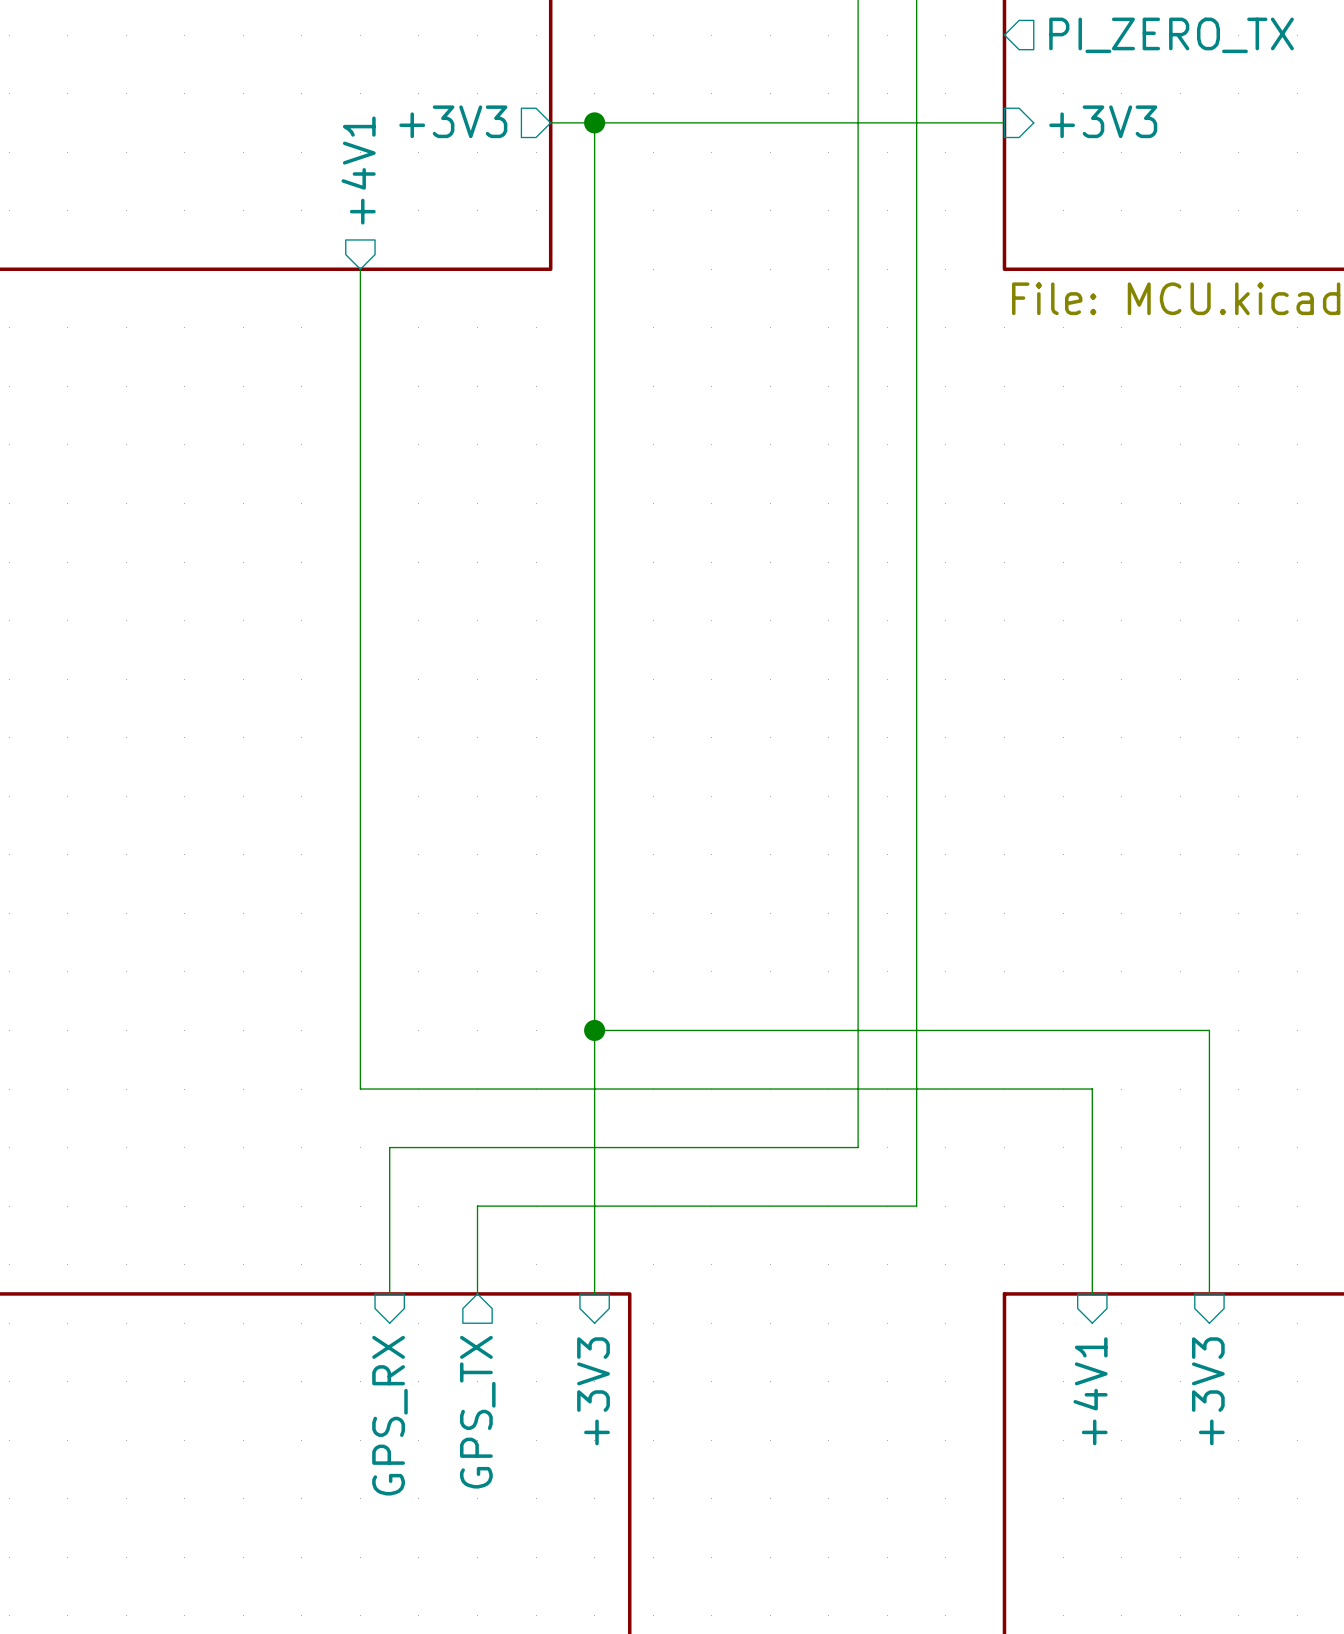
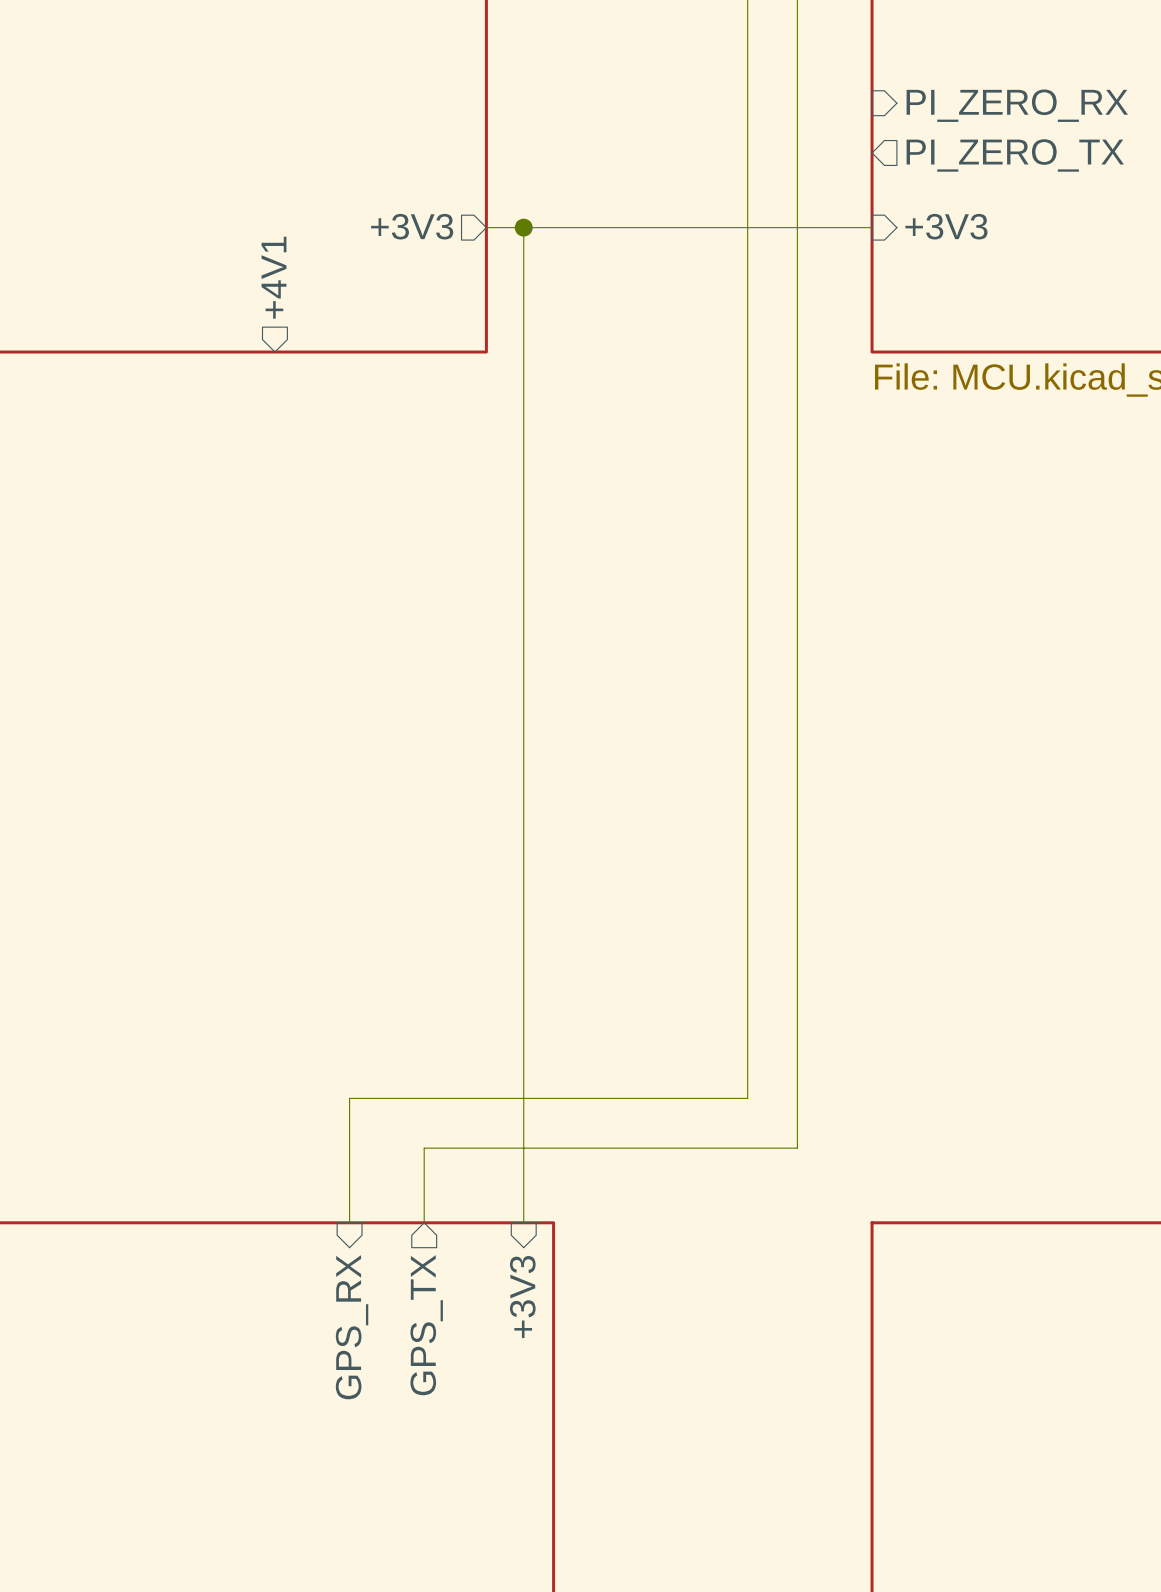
sheet pin position: +4V1 (358, 170) -> +4V1 (274, 277)
wire: (360, 269) (360, 1089) (1092, 1089) (1092, 1293) -> none
wire: (594, 1030) (1209, 1030) (1209, 1293) -> none
junction: (594, 1030) -> none
sheet pin: +4V1 (1090, 1391) -> none
sheet pin: +3V3 (1208, 1391) -> none

